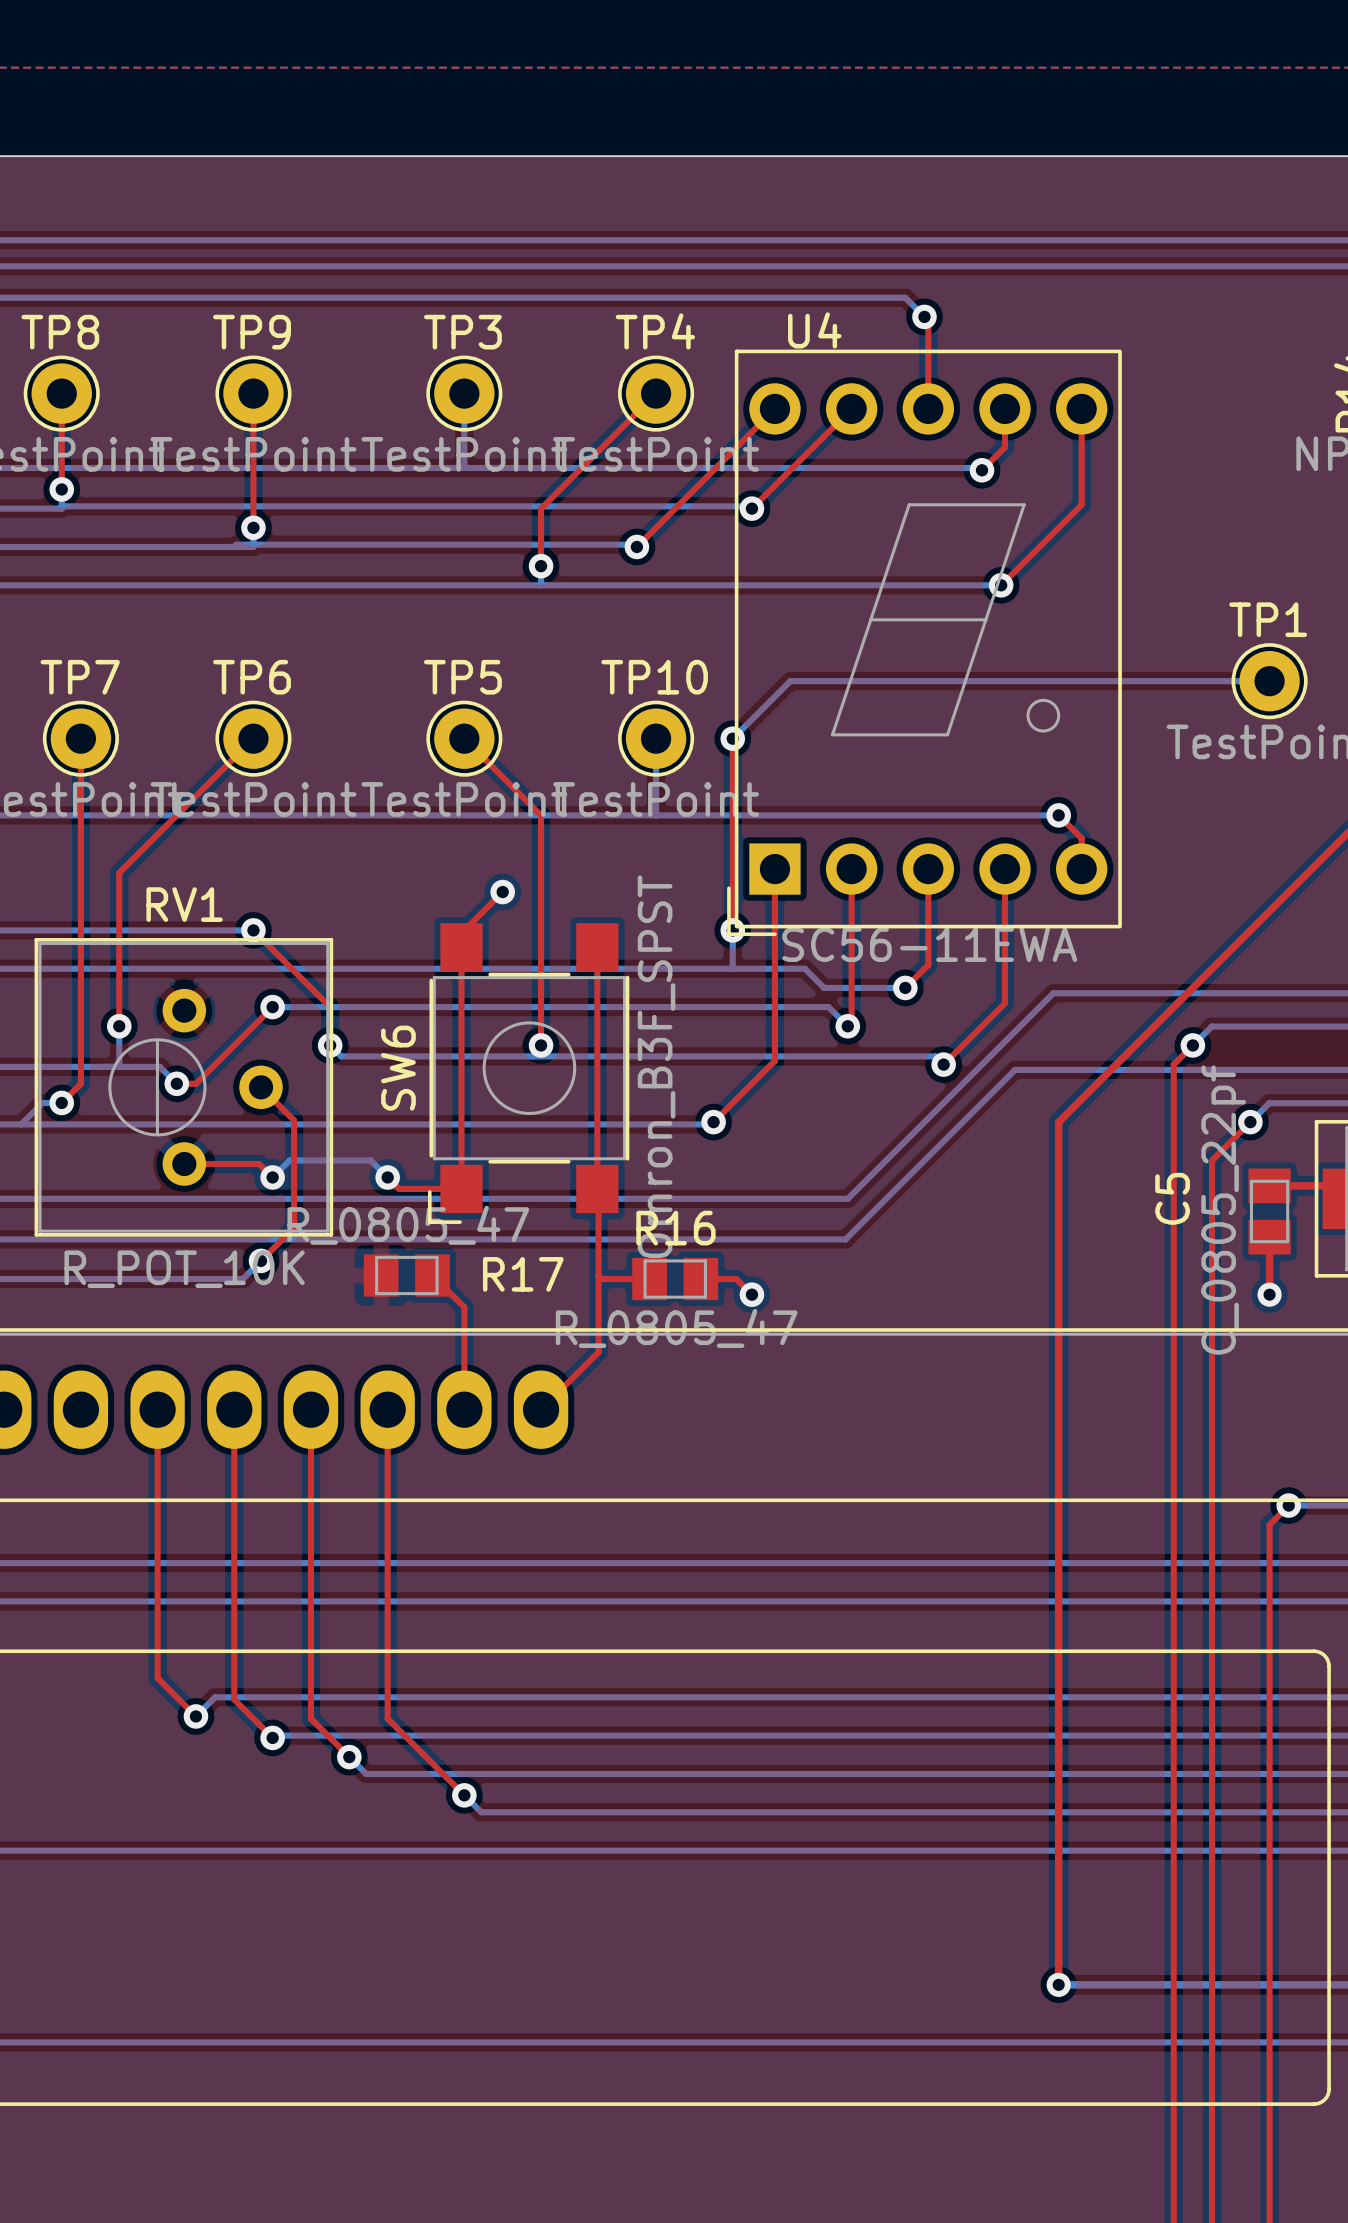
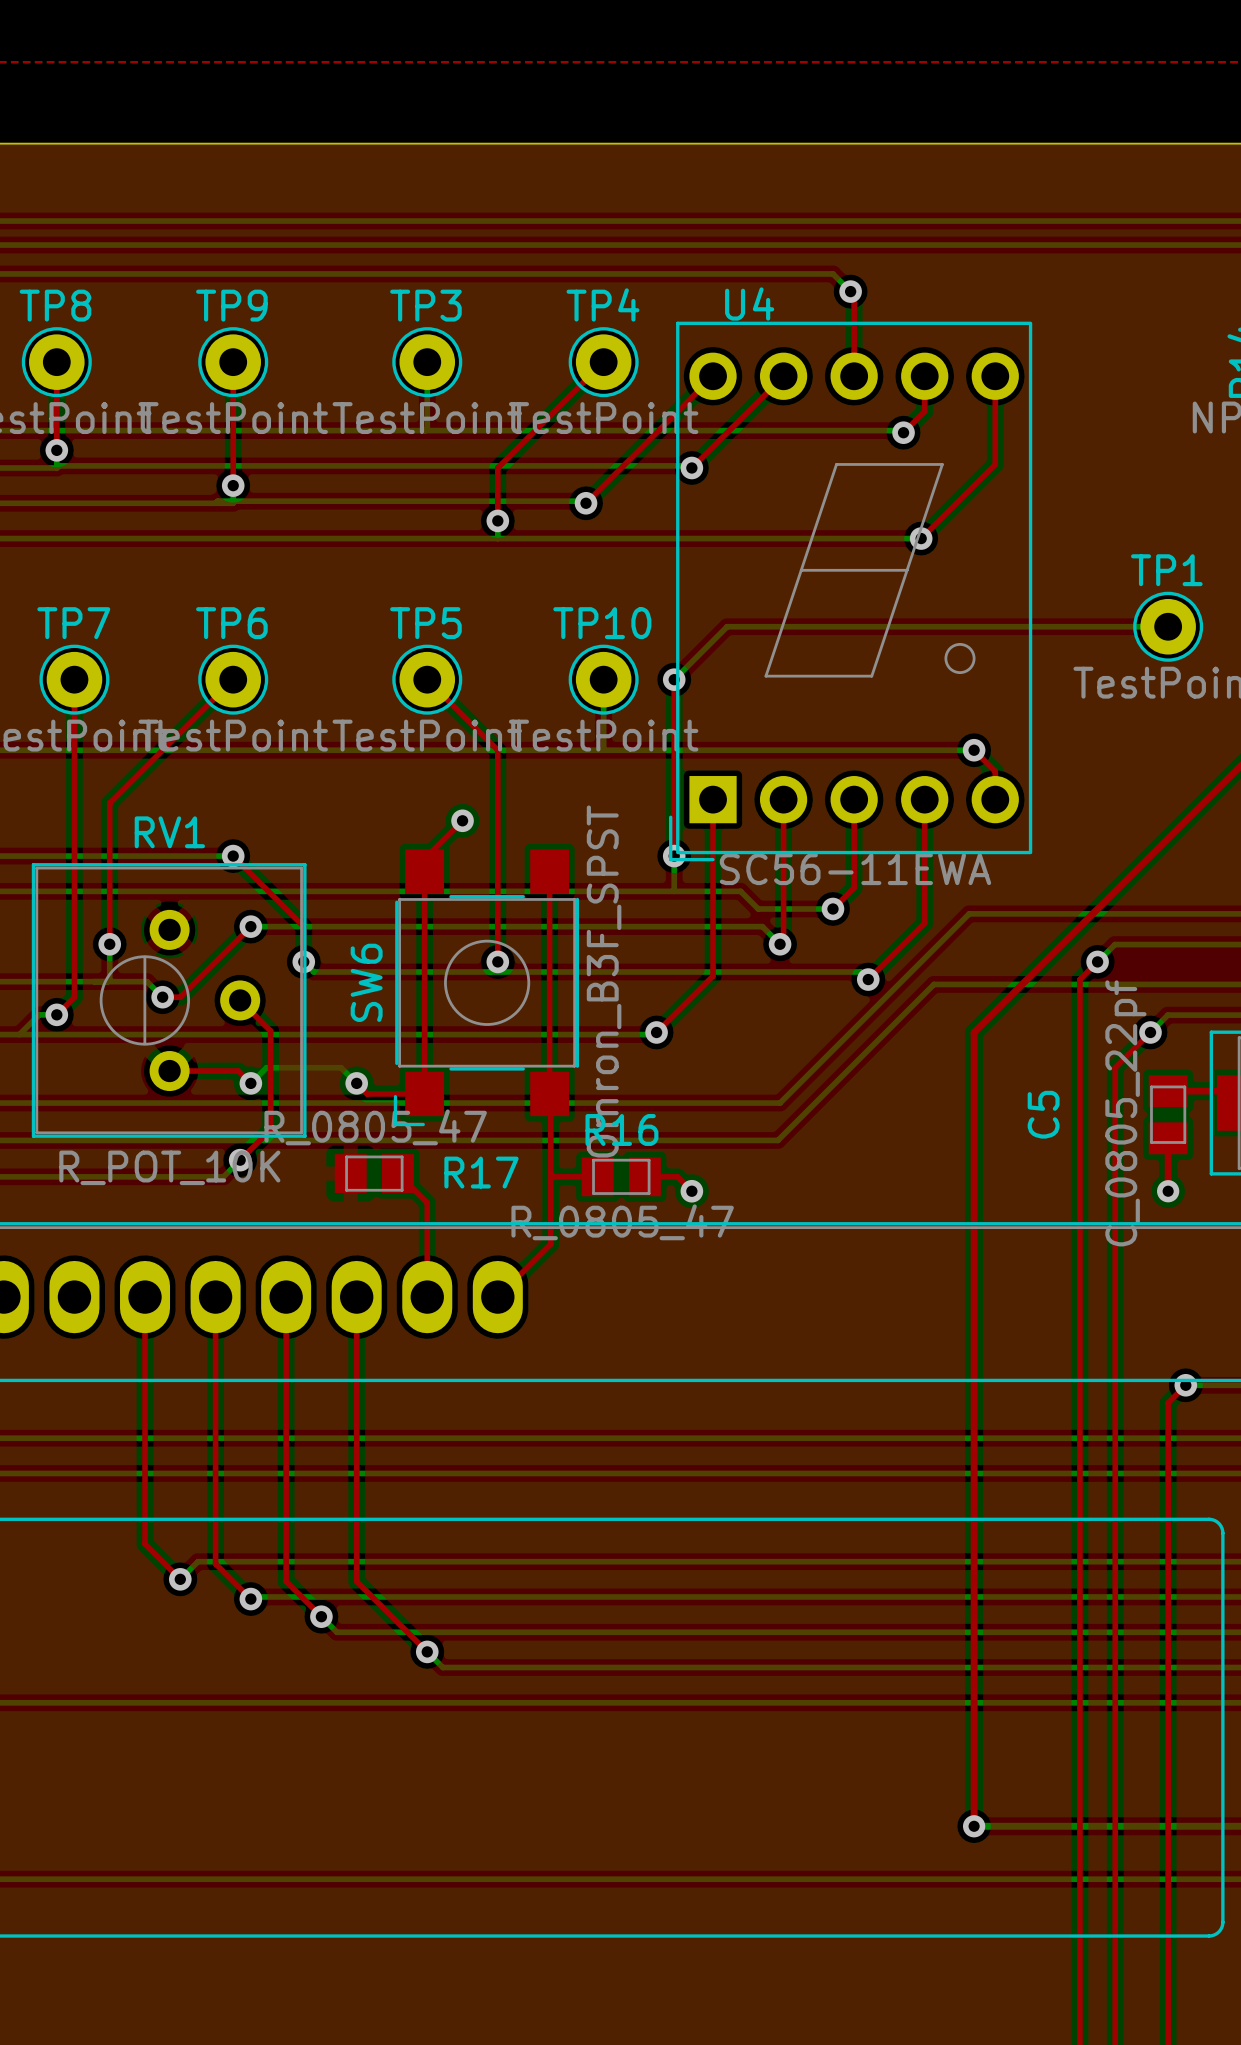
C5 name position: C5 (1172, 1198) -> C5 (1043, 1114)

